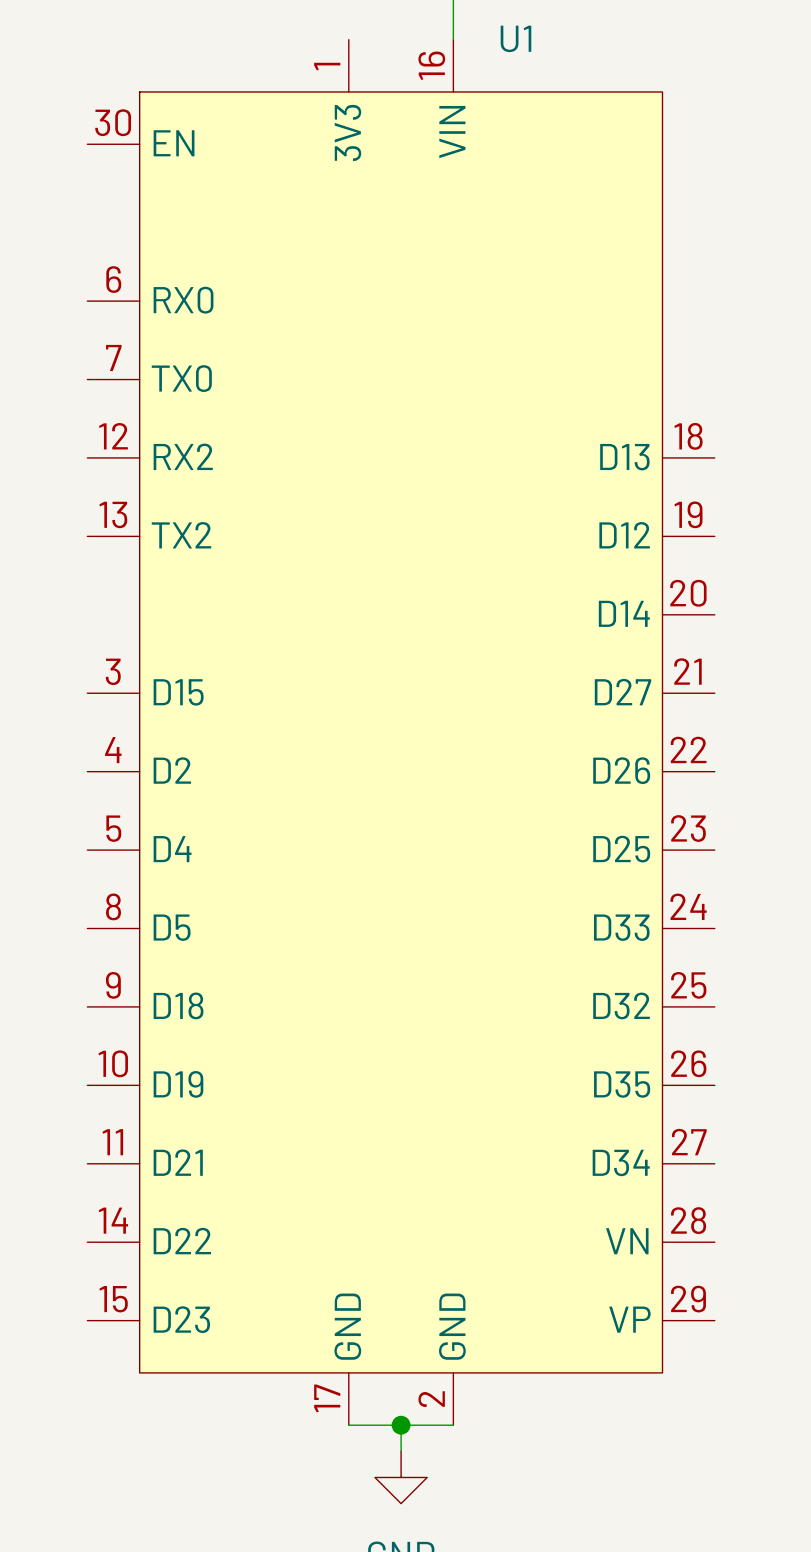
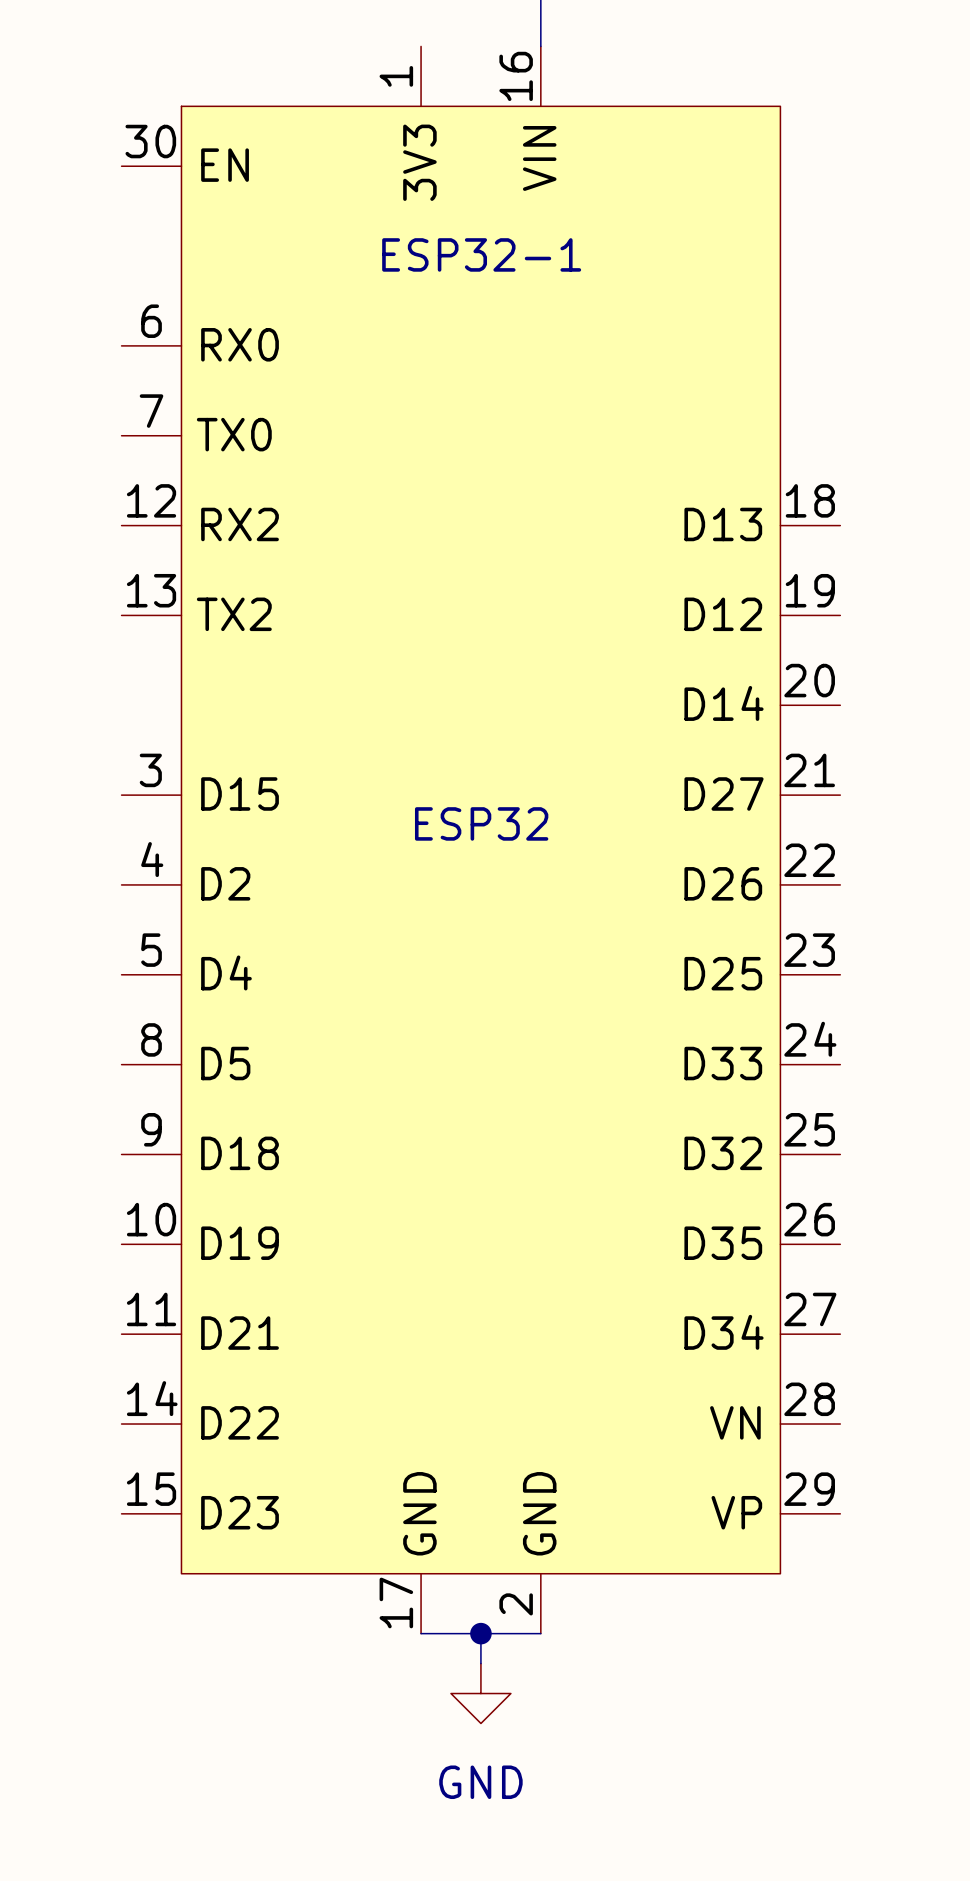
U1 name: U1 (515, 38) -> ESP32-1 (481, 254)
U1 value: none -> ESP32 (481, 823)

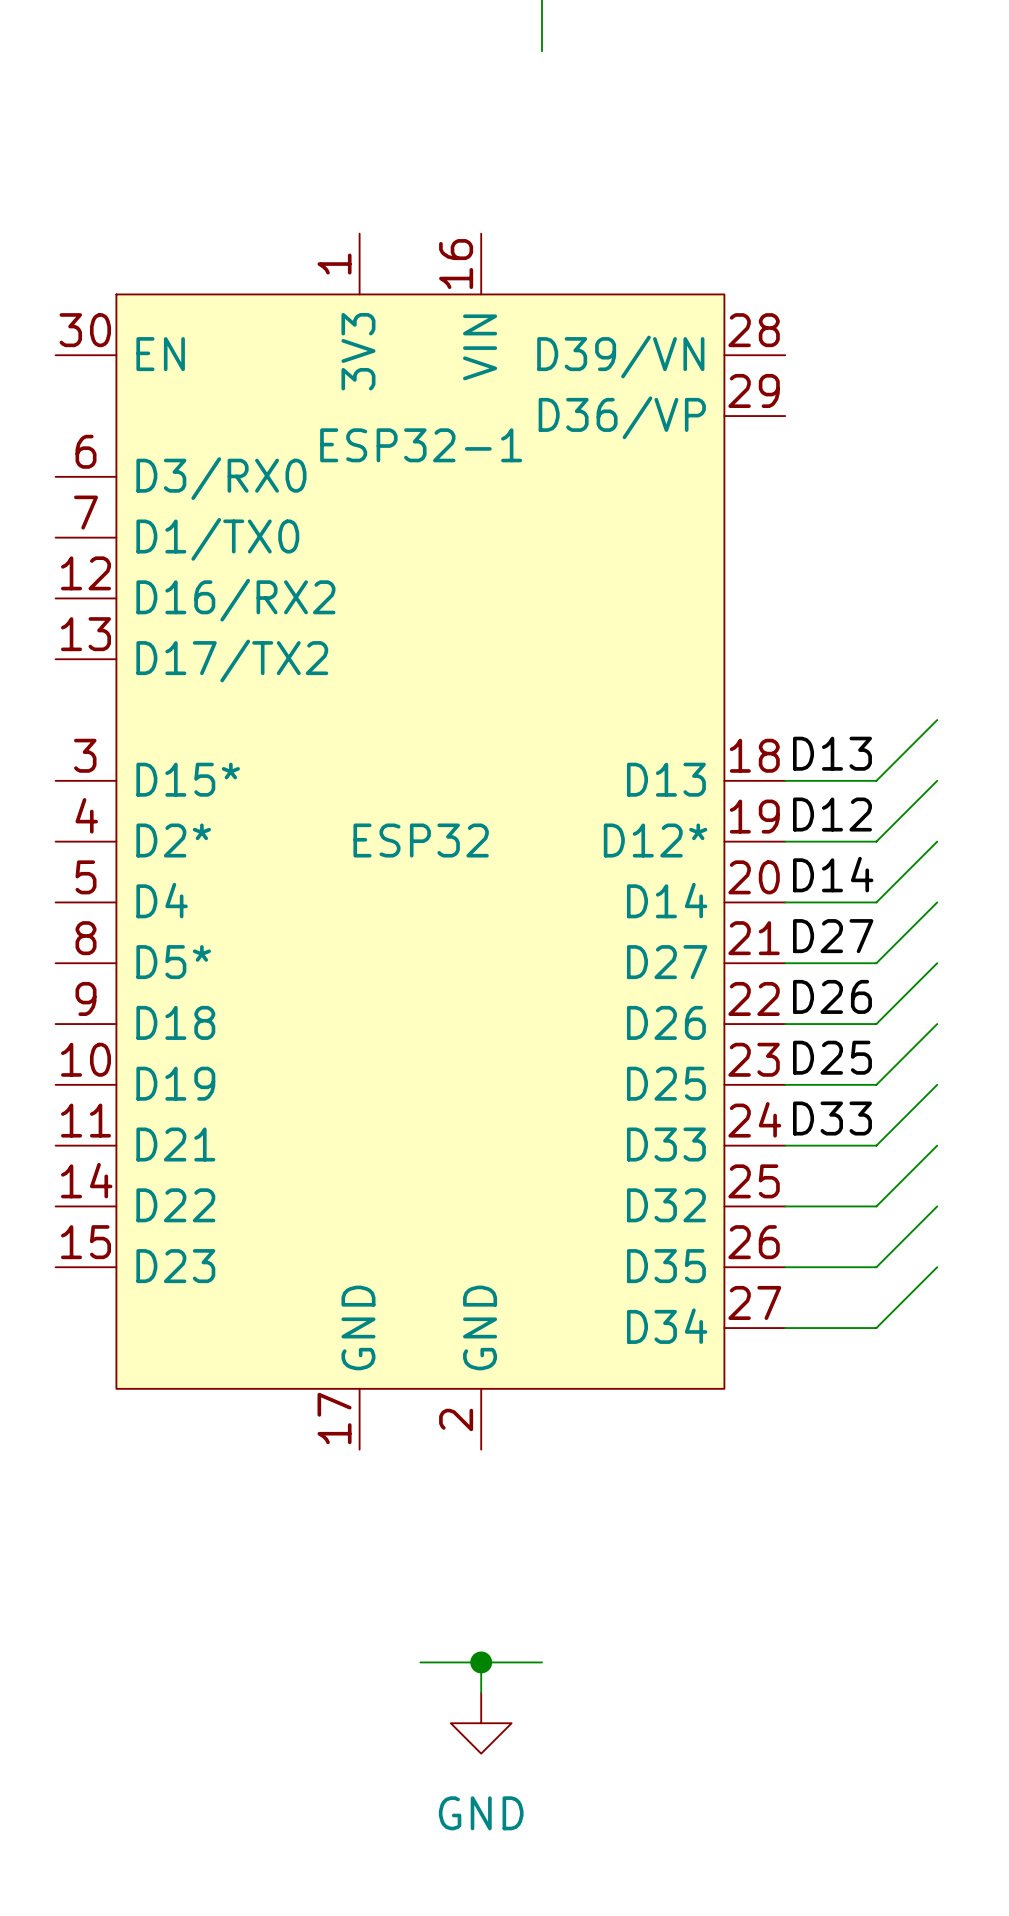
ESP32-1 symbol: [121, 46, 841, 1634] -> [55, 233, 786, 1450]
ESP32-1 name position: ESP32-1 (481, 254) -> ESP32-1 (421, 445)
wire: none -> (937, 720) (876, 780) (785, 780)
label: none -> D13 (832, 753)
wire: none -> (937, 780) (876, 841) (785, 841)
label: none -> D12 (832, 814)
wire: none -> (937, 841) (876, 902) (785, 902)
label: none -> D14 (833, 874)
wire: none -> (937, 902) (876, 963) (785, 963)
label: none -> D27 (833, 936)
wire: none -> (937, 963) (876, 1024) (785, 1024)
label: none -> D26 (832, 996)
wire: none -> (937, 1024) (876, 1084) (785, 1084)
label: none -> D25 (832, 1057)
wire: none -> (937, 1084) (876, 1145) (785, 1145)
label: none -> D33 (832, 1118)
wire: none -> (937, 1145) (876, 1206) (785, 1206)
wire: none -> (937, 1206) (876, 1267) (785, 1267)
wire: none -> (937, 1267) (876, 1328) (785, 1328)

